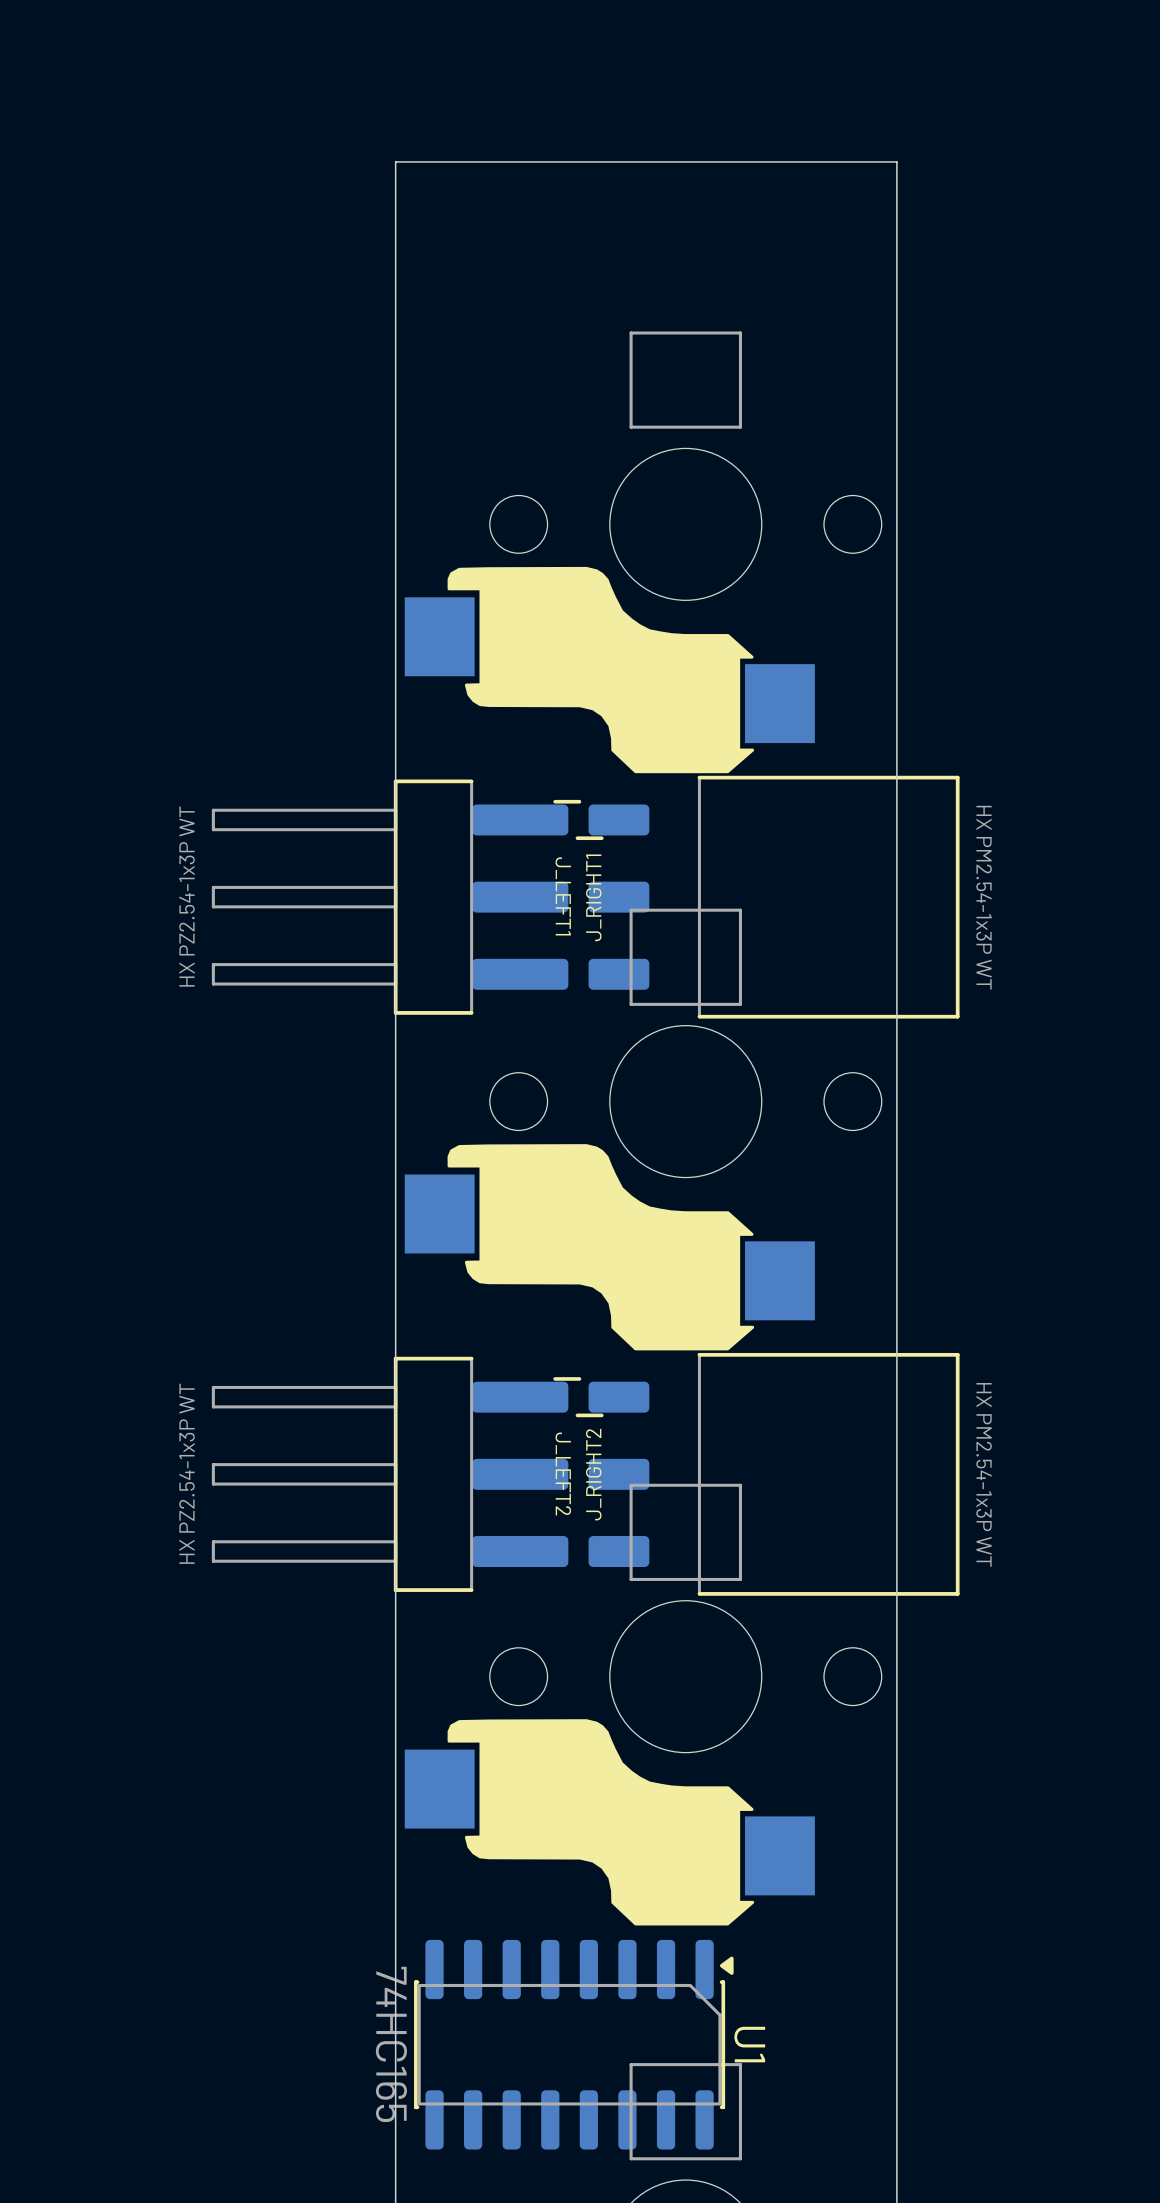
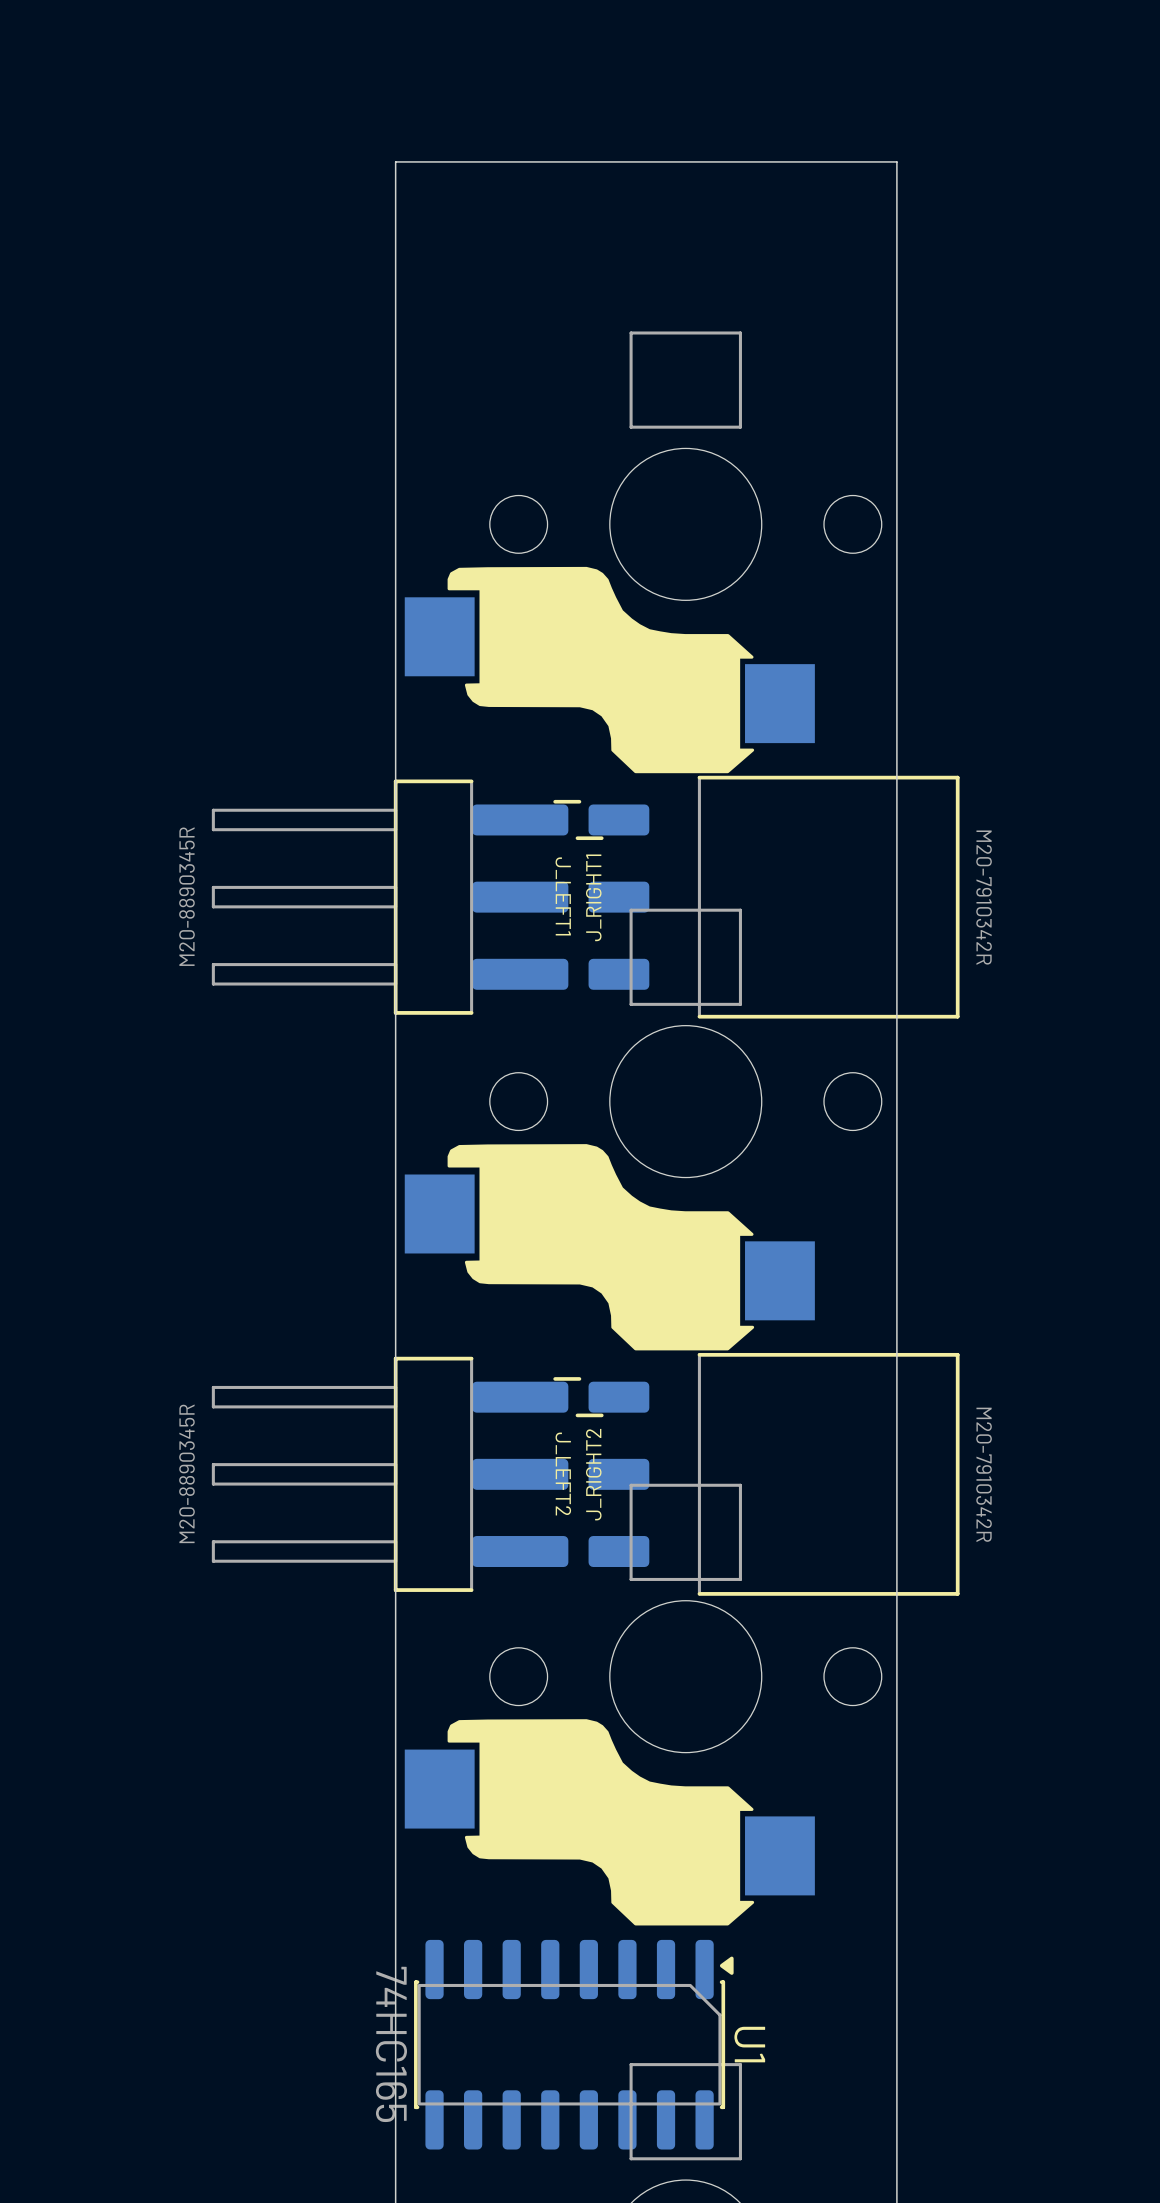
J_RIGHT1 value: HX PZ2.54-1x3P WT (186, 896) -> M20-8890345R (186, 896)
J_LEFT1 value: HX PM2.54-1x3P WT (984, 897) -> M20-7910342R (984, 897)
J_RIGHT2 value: HX PZ2.54-1x3P WT (186, 1473) -> M20-8890345R (186, 1473)
J_LEFT2 value: HX PM2.54-1x3P WT (984, 1474) -> M20-7910342R (984, 1474)

